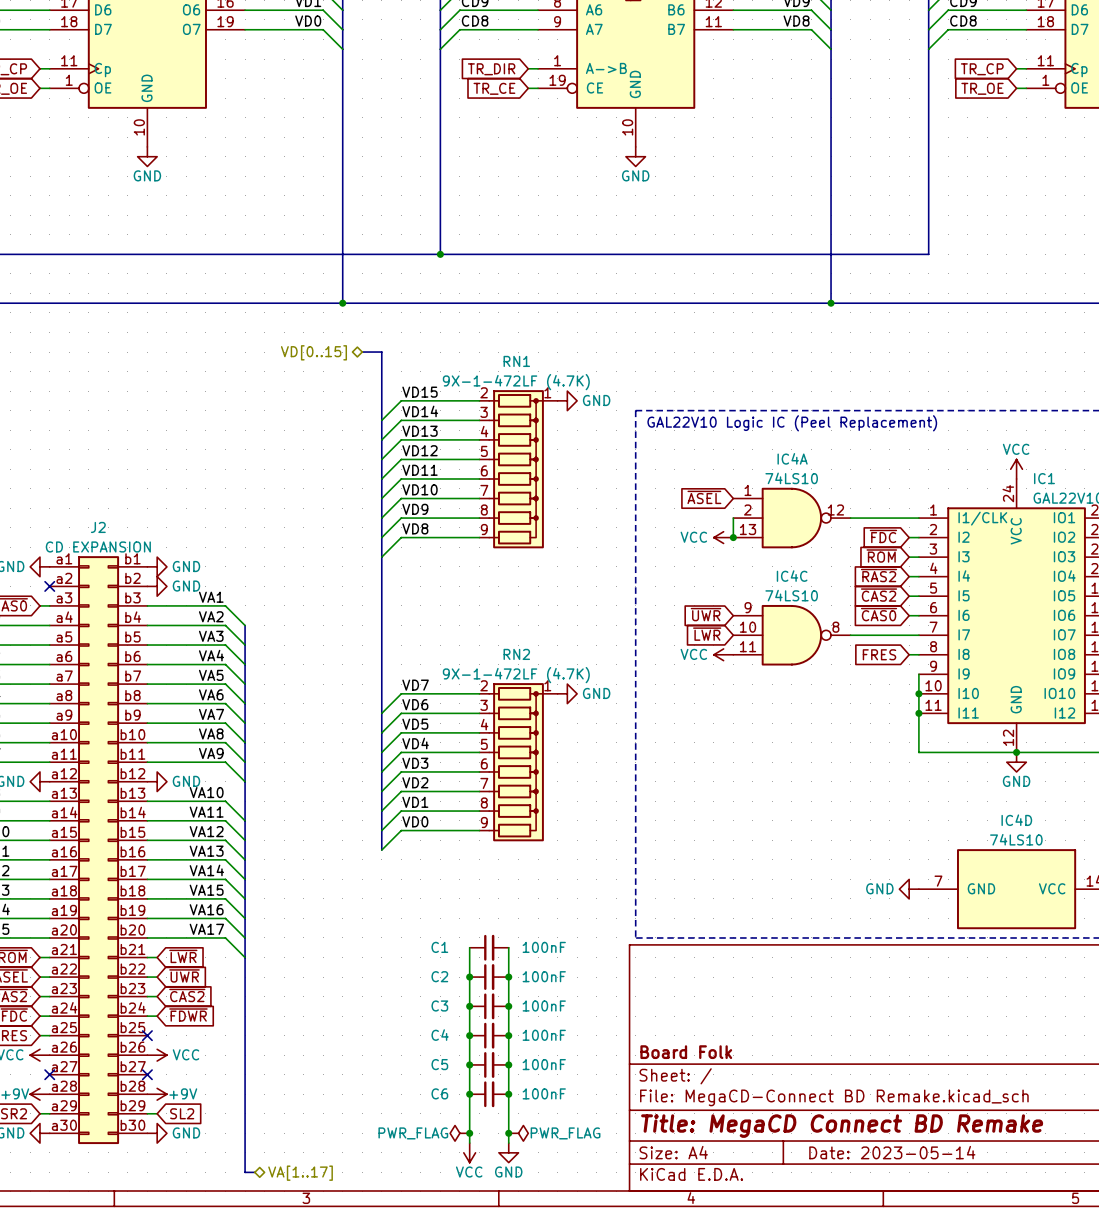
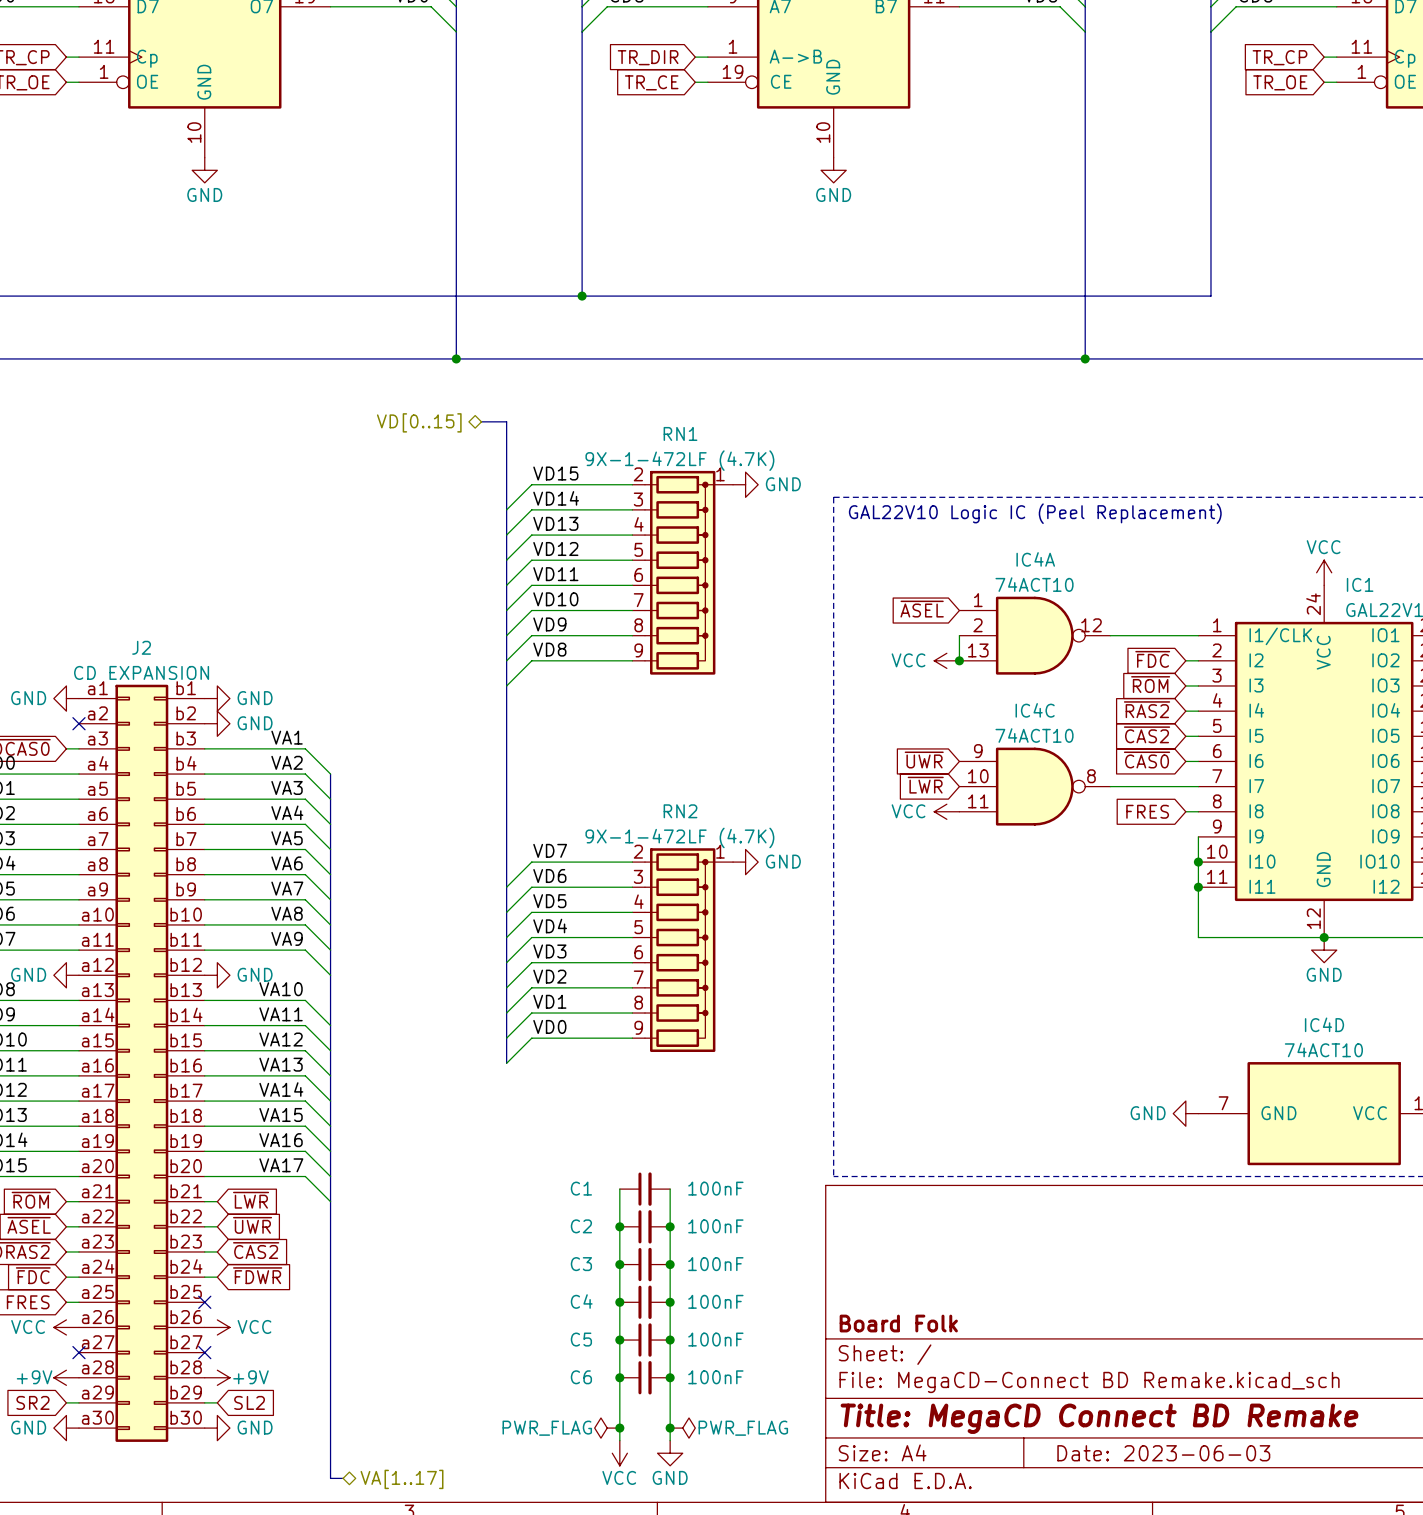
IC4A value: 74LS10 (791, 478) -> 74ACT10 (1034, 584)
IC4C value: 74LS10 (791, 595) -> 74ACT10 (1034, 735)
IC4D value: 74LS10 (1016, 839) -> 74ACT10 (1323, 1049)
title block: Date: 2023-05-14 (892, 1152) -> Date: 2023-06-03 (1163, 1453)

